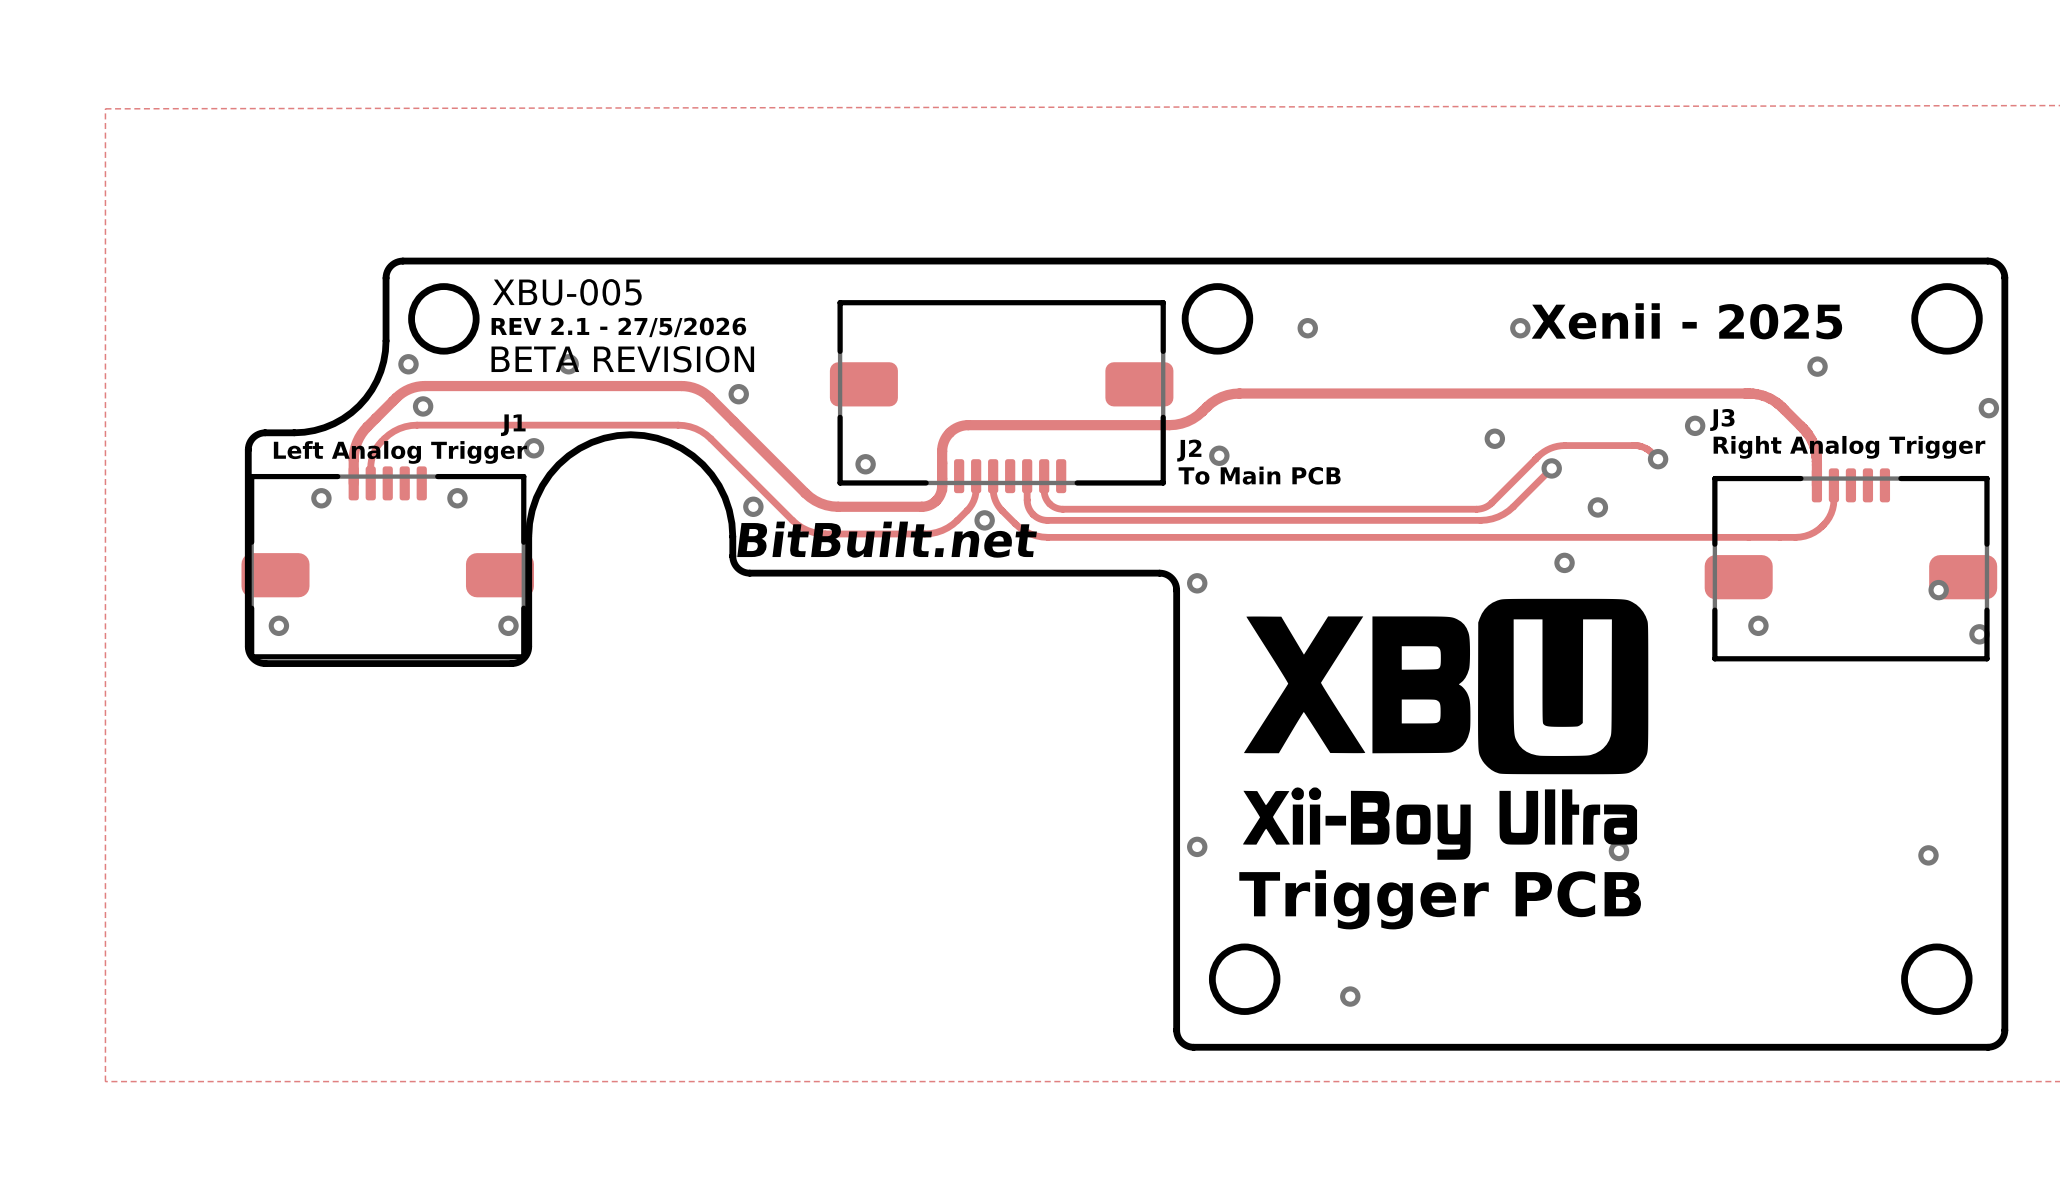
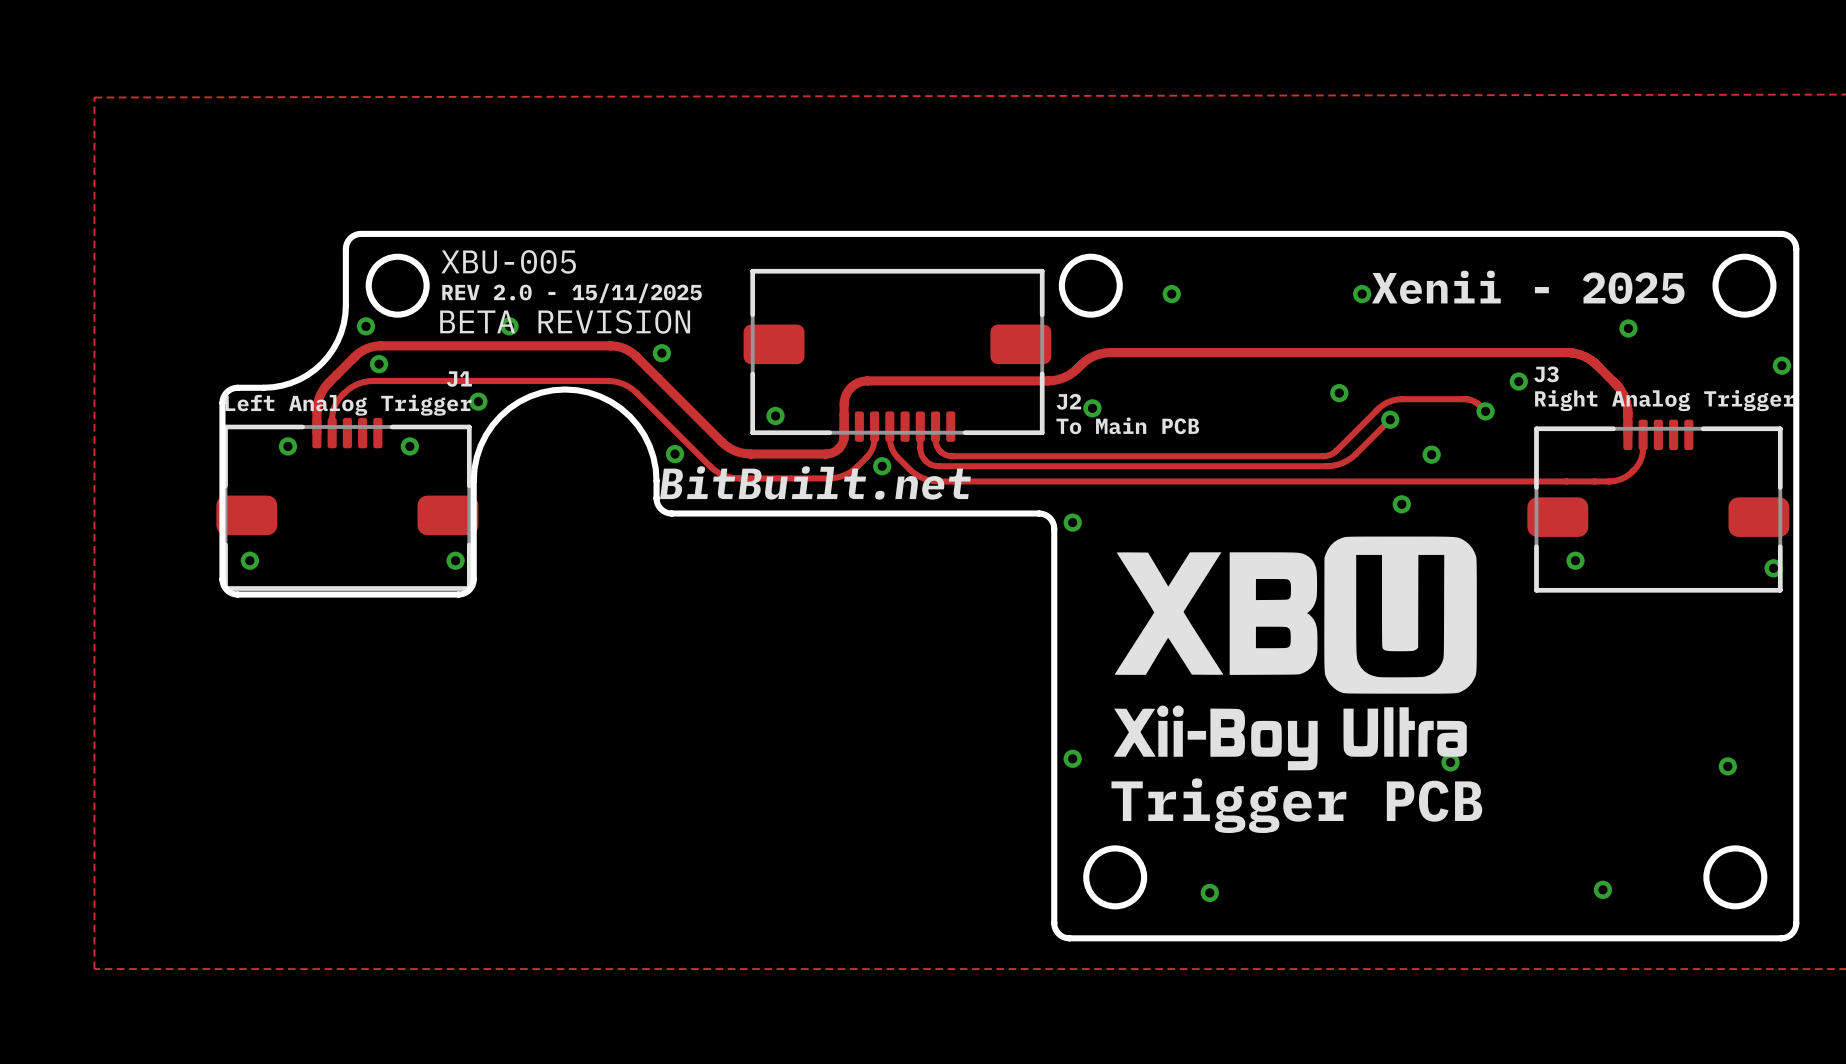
text: REV 2.1 - 27/5/2026 (618, 327) -> REV 2.0 - 15/11/2025 (572, 293)
via: (1938, 590) -> none
via: none -> (1602, 889)

